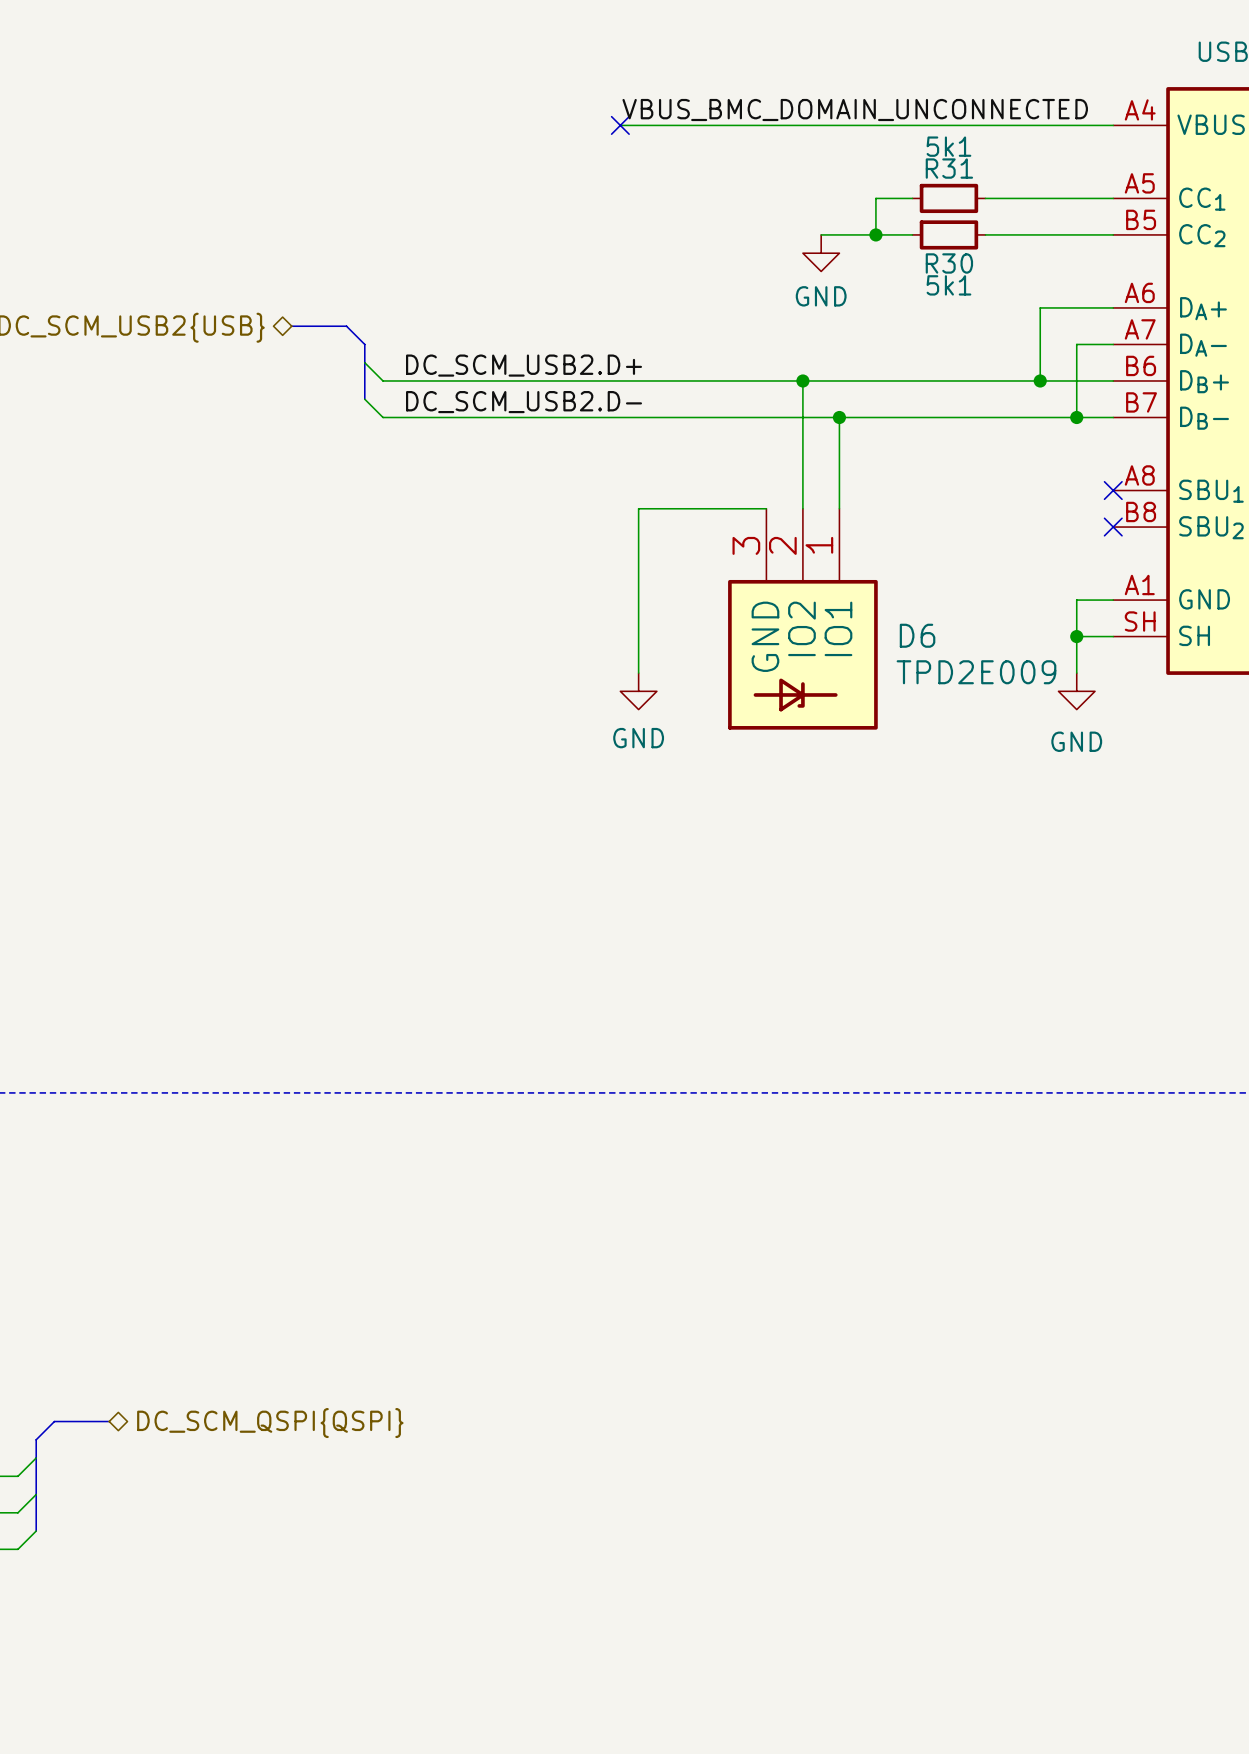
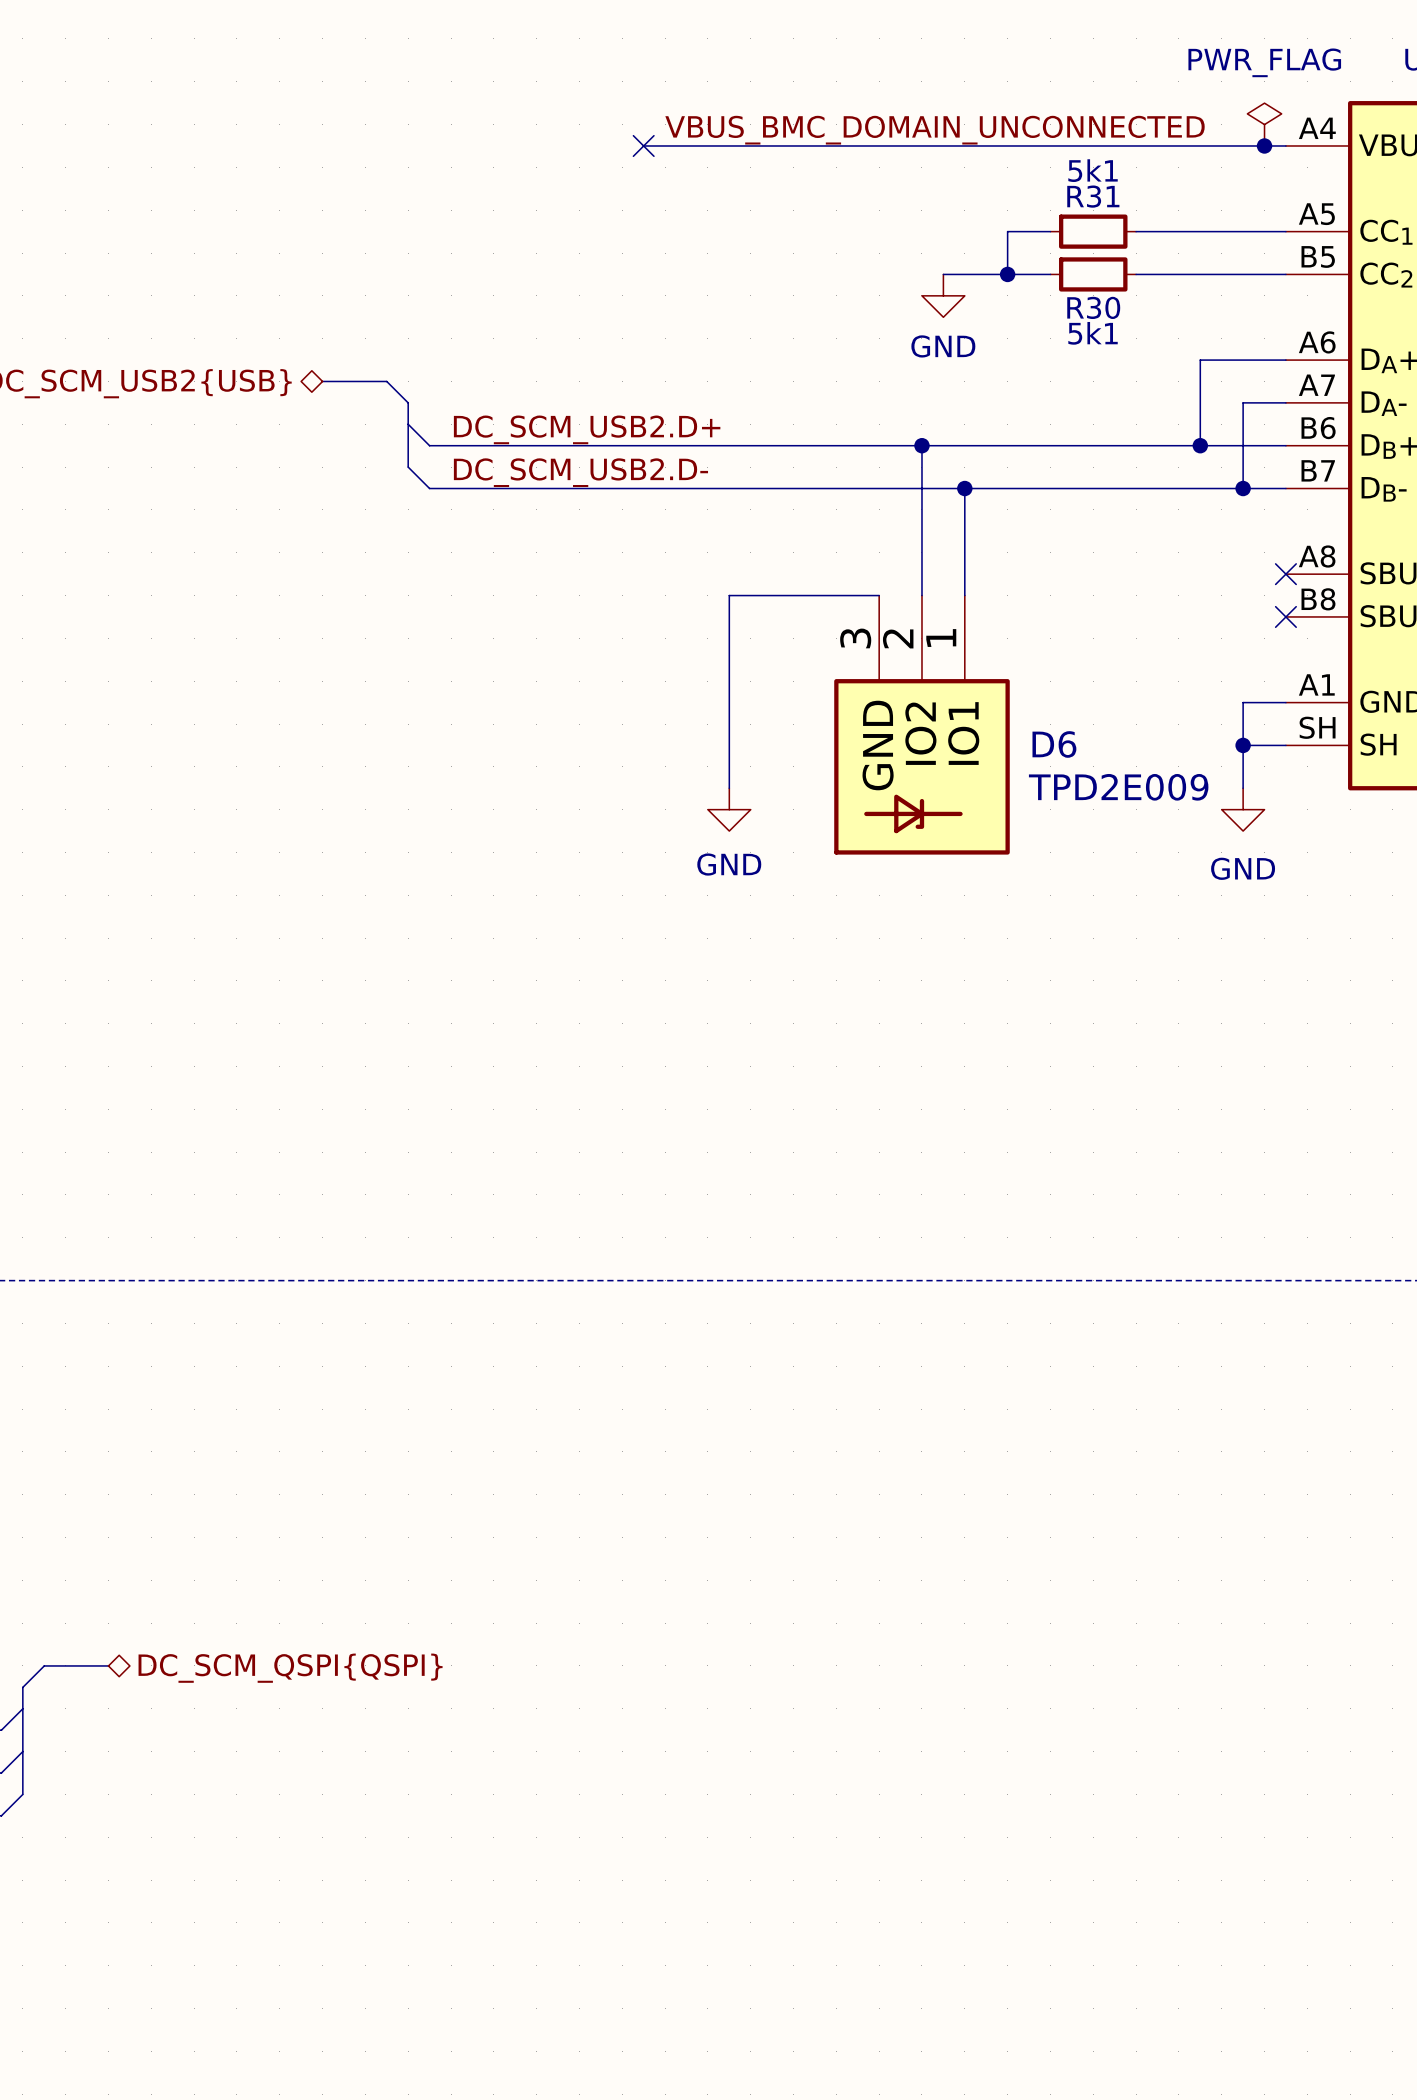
power symbol: none -> PWR_FLAG (1264, 124)
label position: VBUS_BMC_DOMAIN_UNCONNECTED (855, 110) -> VBUS_BMC_DOMAIN_UNCONNECTED (935, 130)
wire: none -> (643, 145) (707, 145)
no-connect mark position: (620, 125) -> (643, 145)
junction: none -> (1264, 145)

